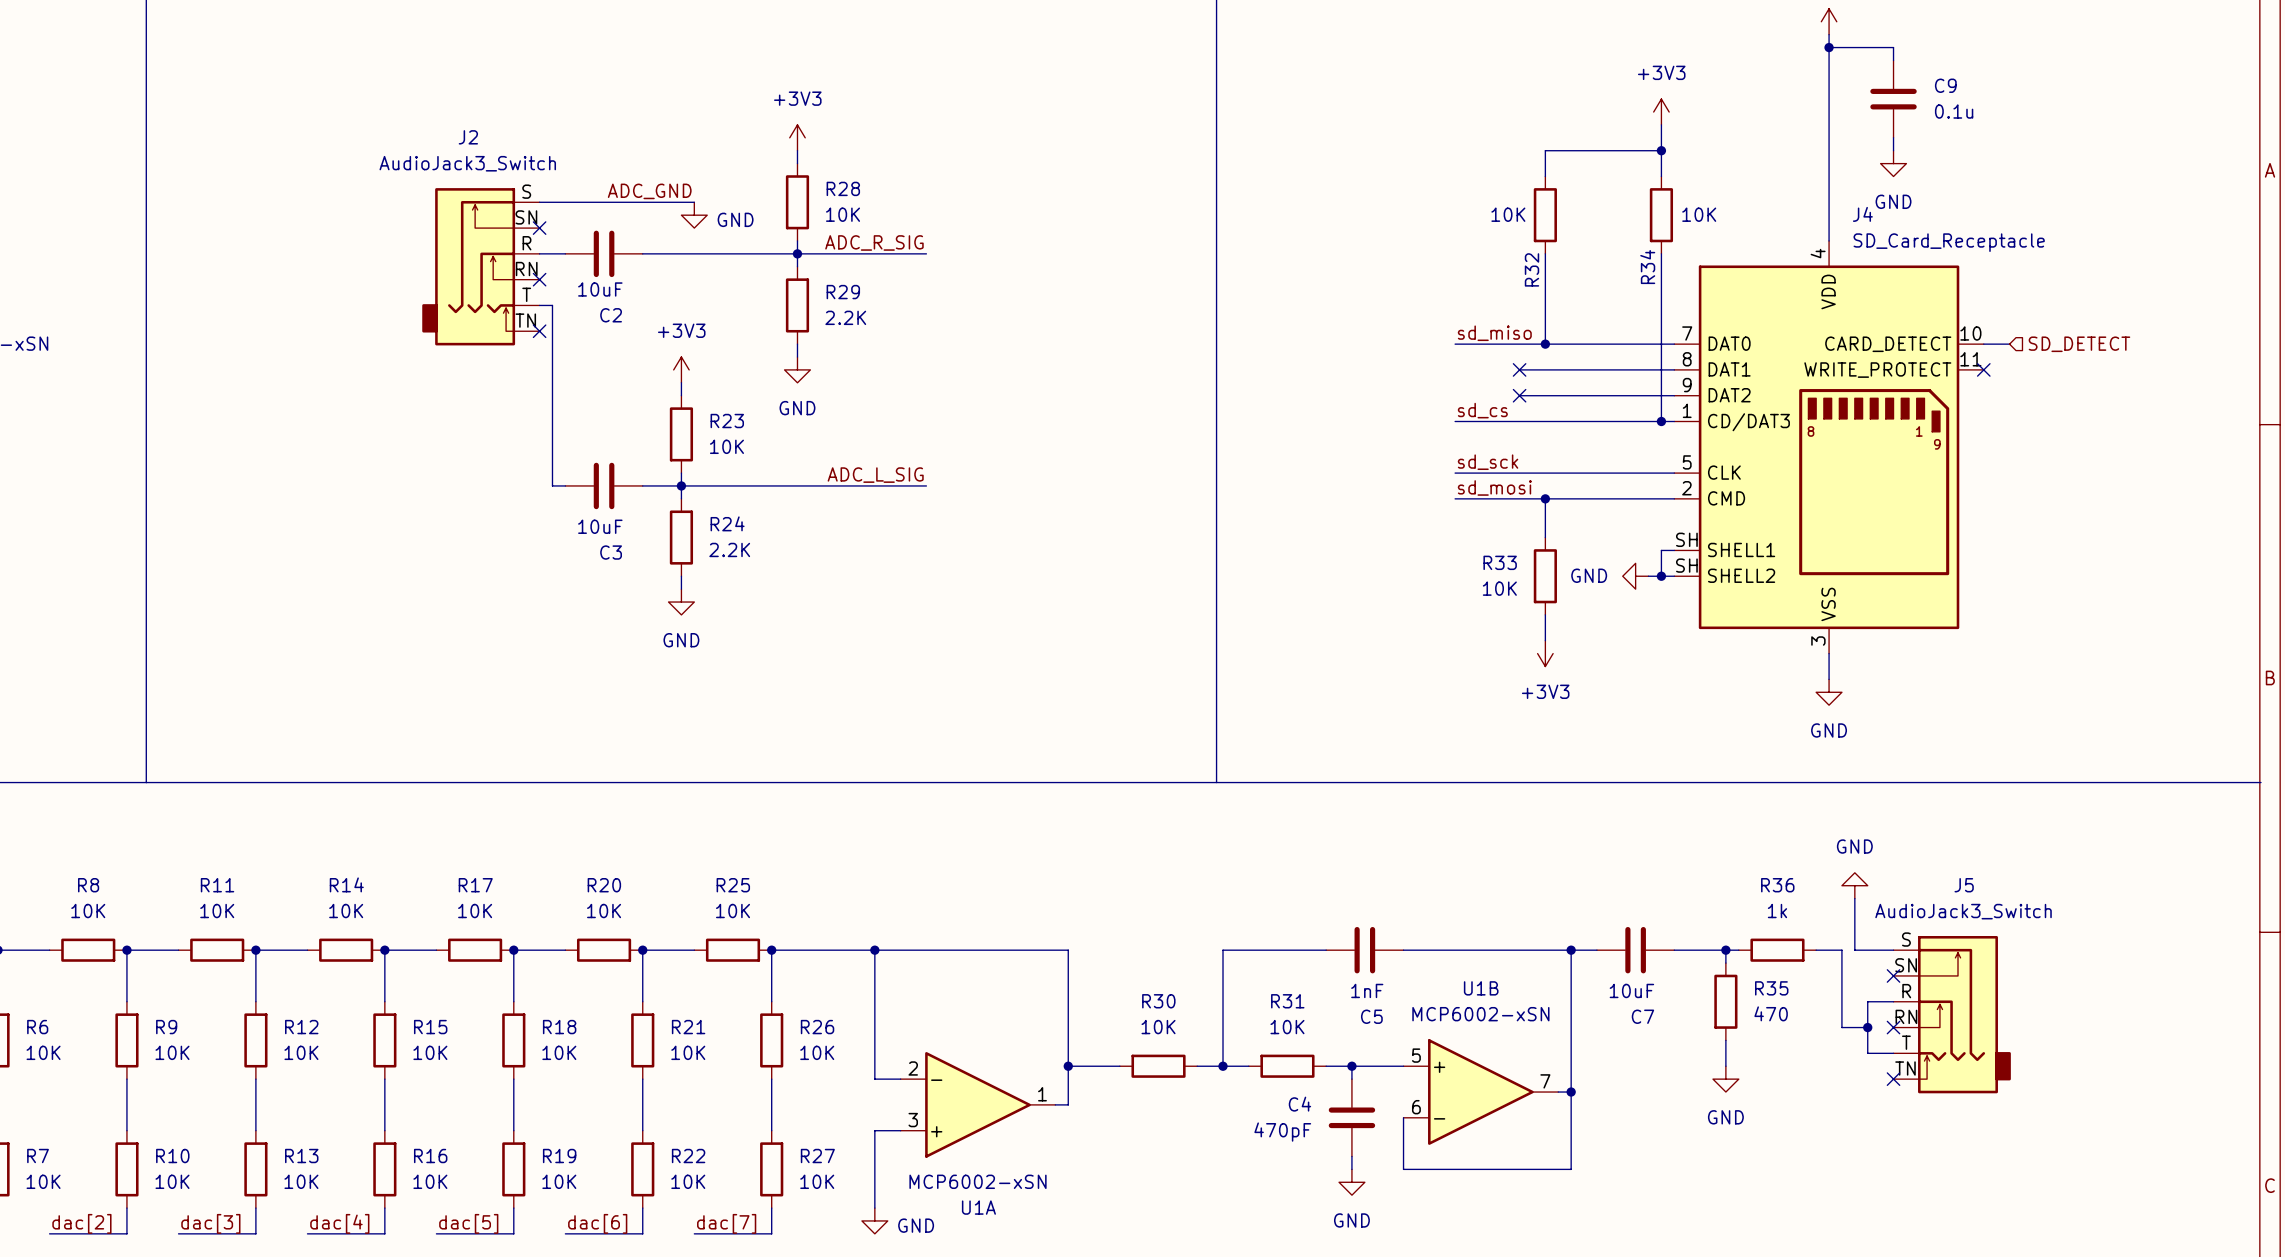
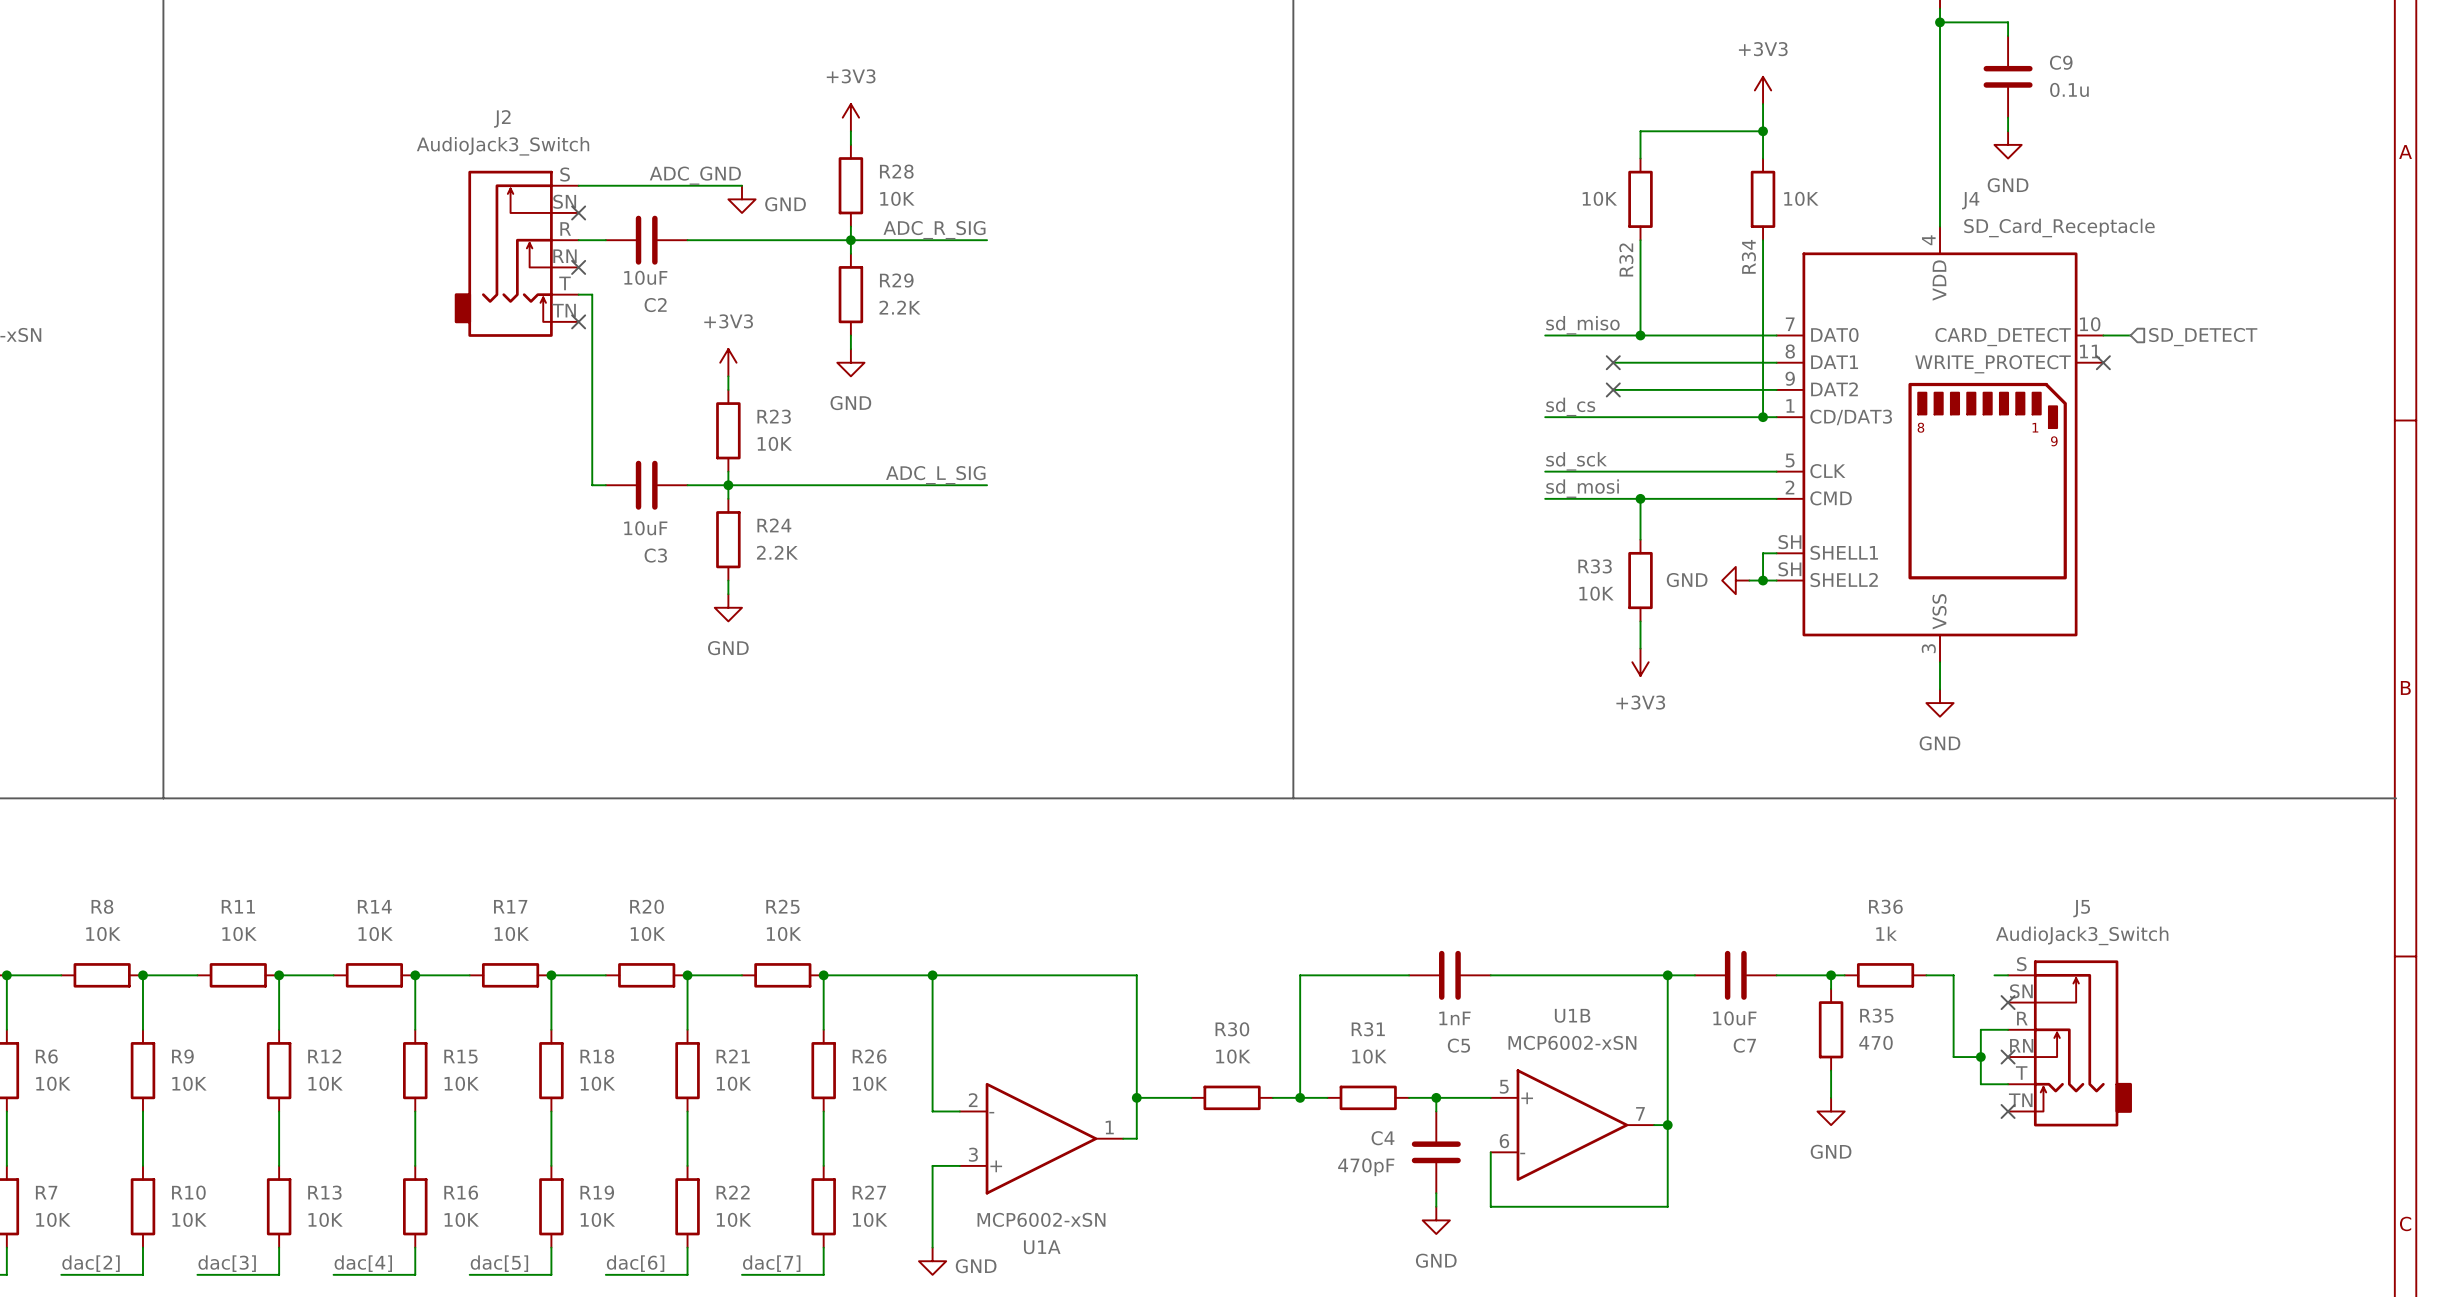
power symbol: GND (1854, 885) -> none
wire: (1854, 898) (1854, 950) (1880, 950) -> none

